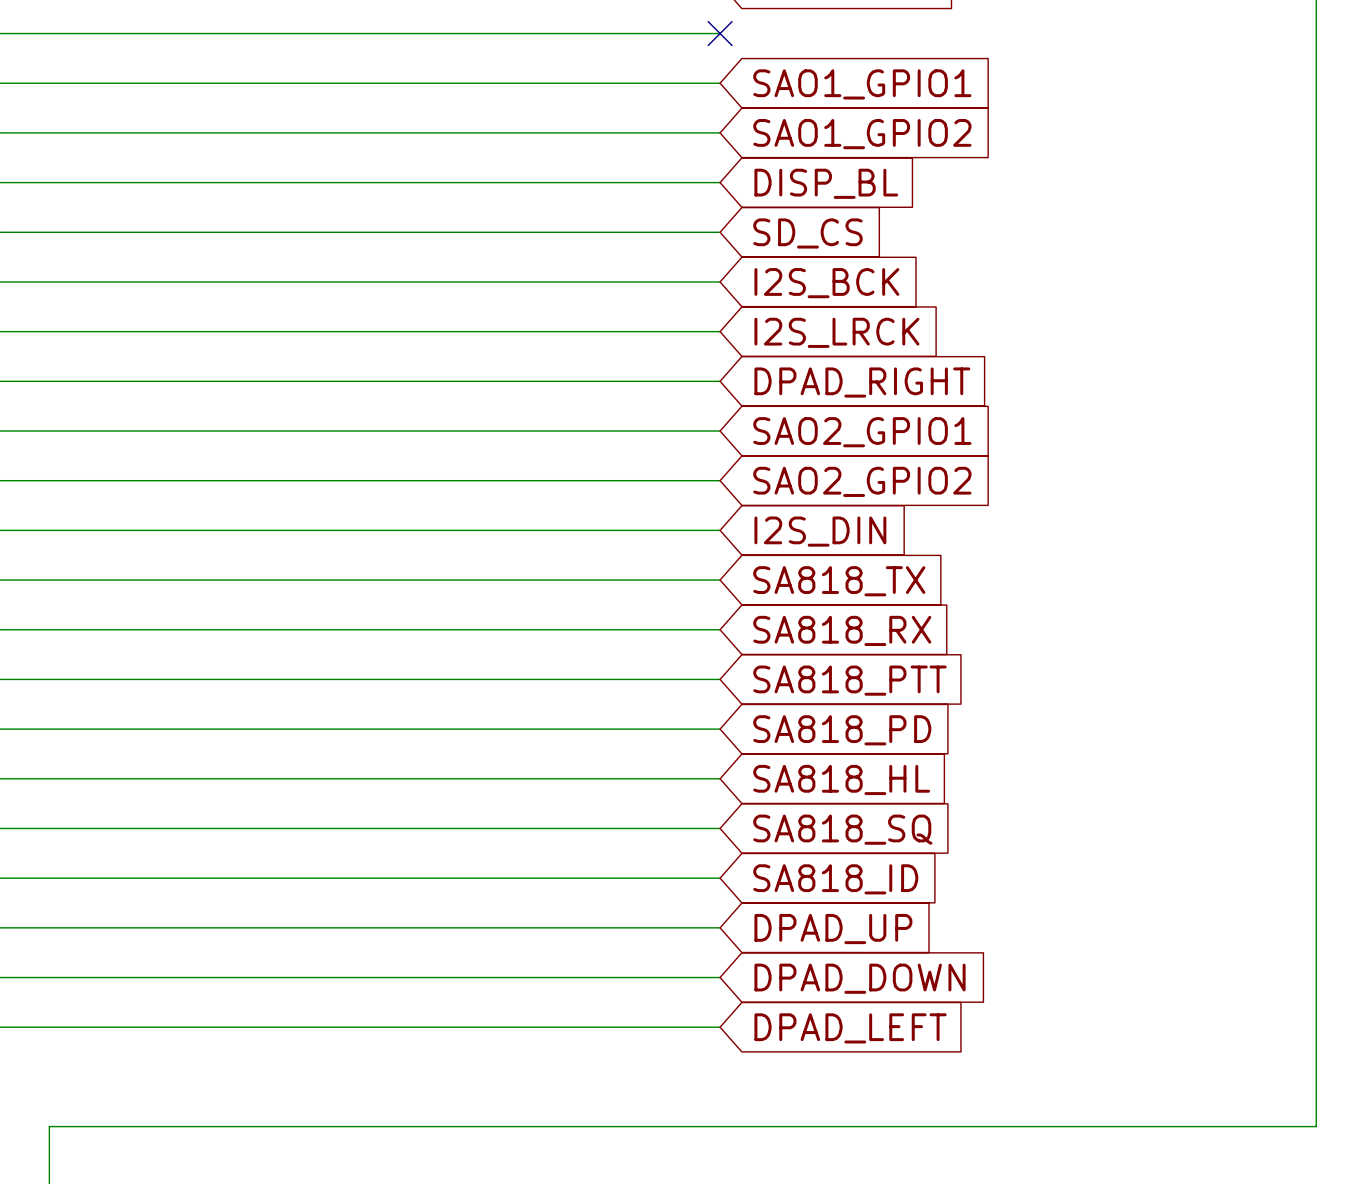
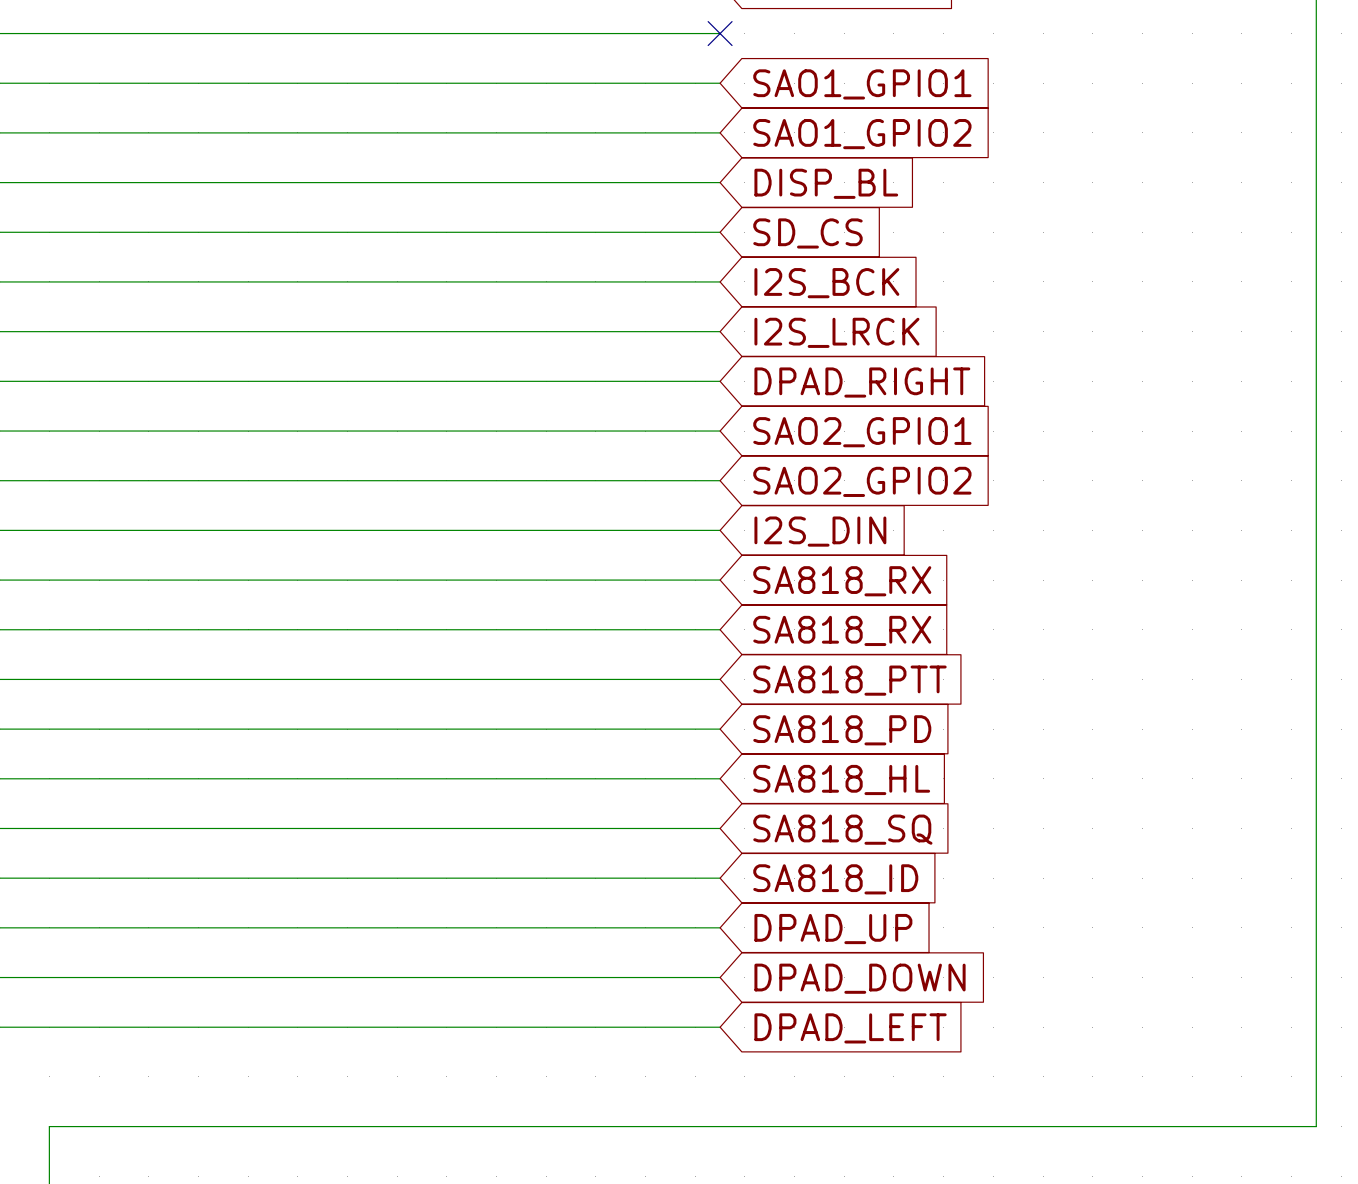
global label: SA818_TX (839, 581) -> SA818_RX (842, 581)

